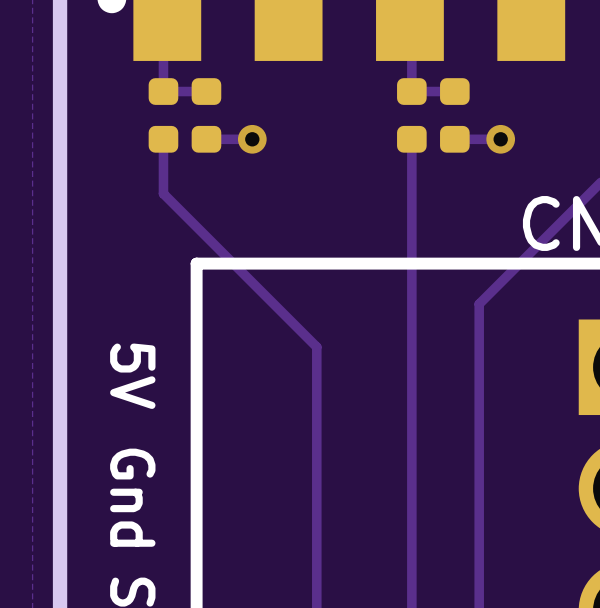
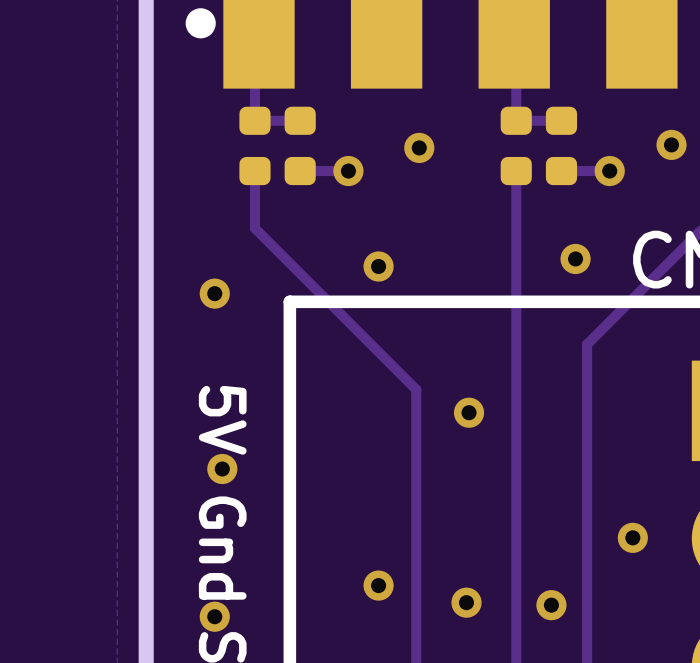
via: none -> (671, 144)
via: none -> (419, 147)
via: none -> (575, 258)
via: none -> (378, 266)
via: none -> (214, 293)
via: none -> (469, 412)
via: none -> (222, 469)
via: none -> (632, 537)
via: none -> (378, 585)
via: none -> (466, 602)
via: none -> (551, 605)
via: none -> (214, 616)

